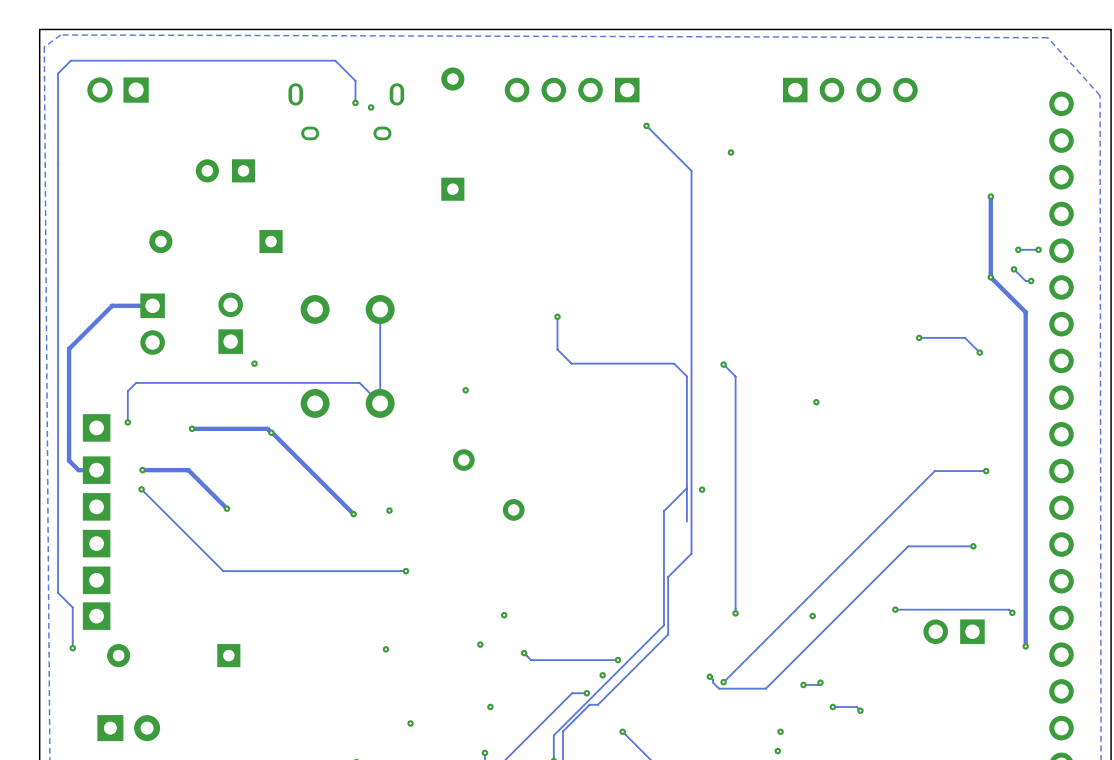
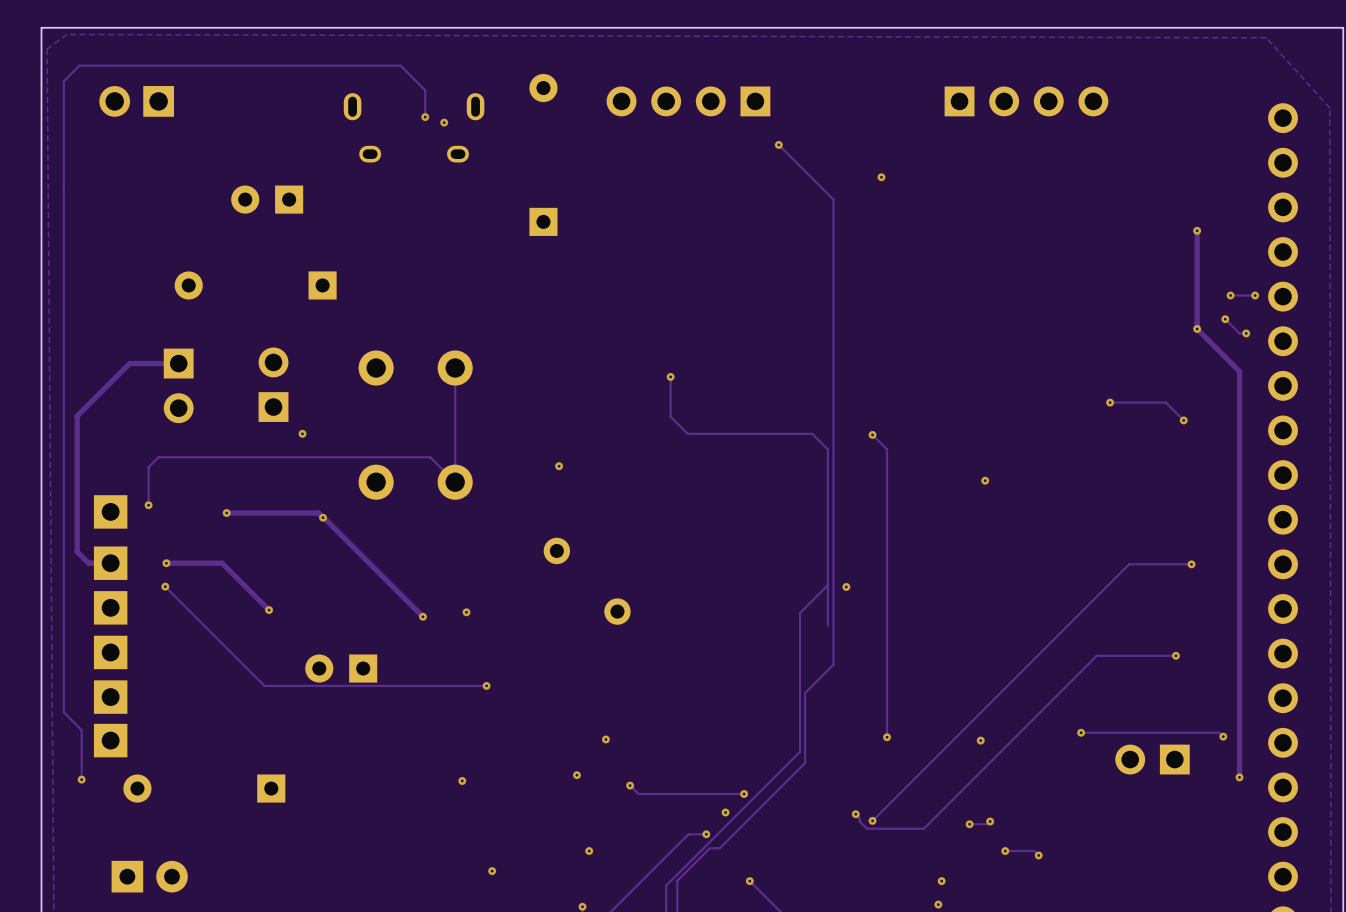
part: none -> (341, 668)

